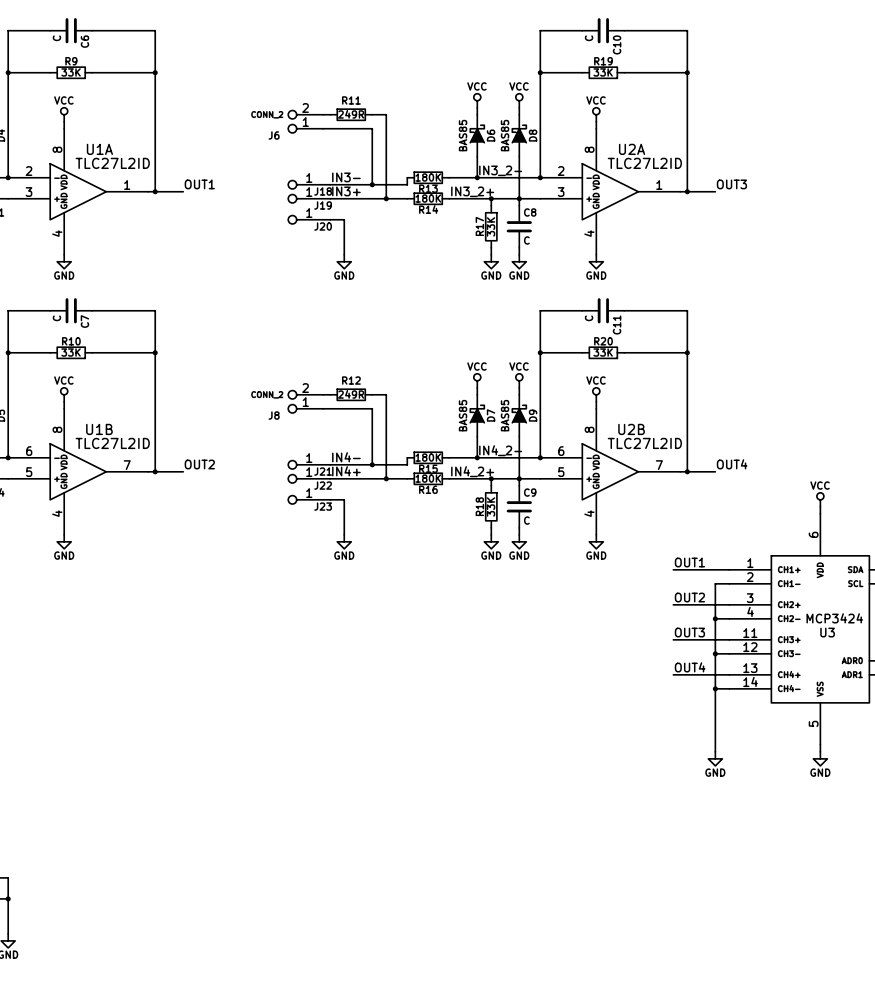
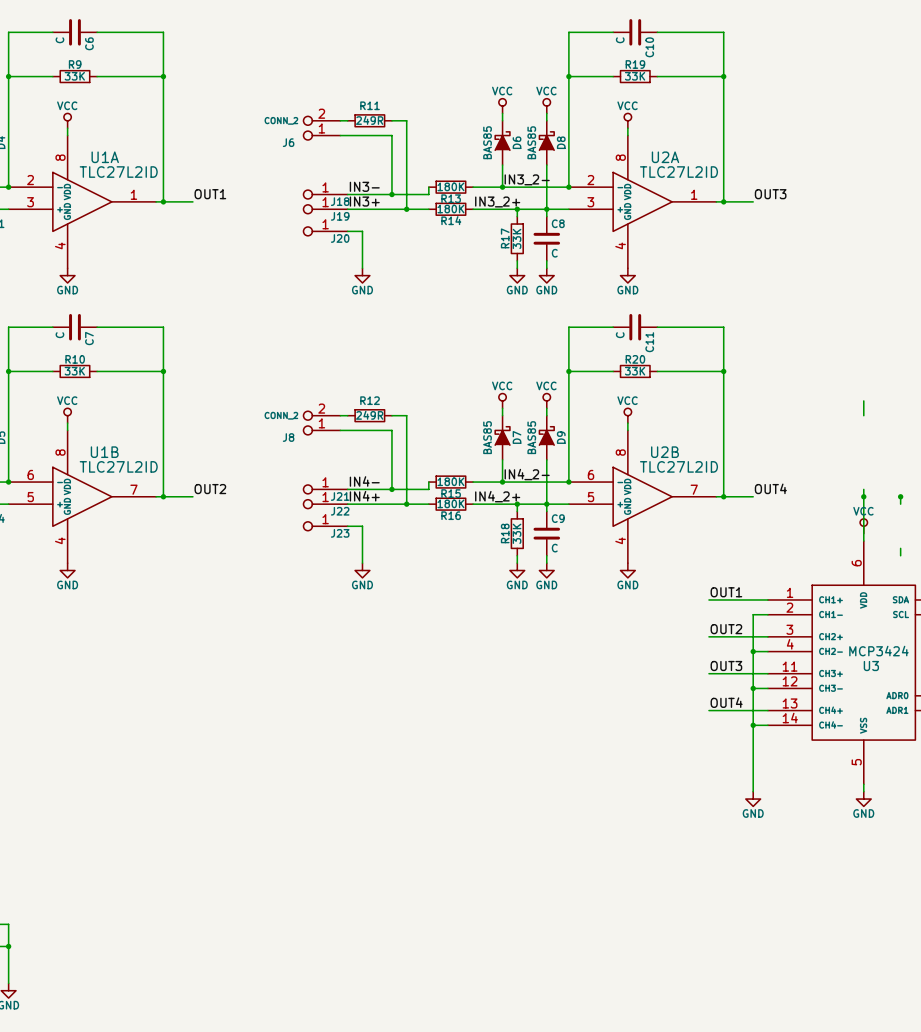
wire: none -> (863, 400) (863, 415)
wire: none -> (863, 489) (863, 533)
junction: none -> (863, 496)
wire: none -> (900, 496) (900, 504)
junction: none -> (900, 496)
wire: none -> (900, 548) (900, 555)

